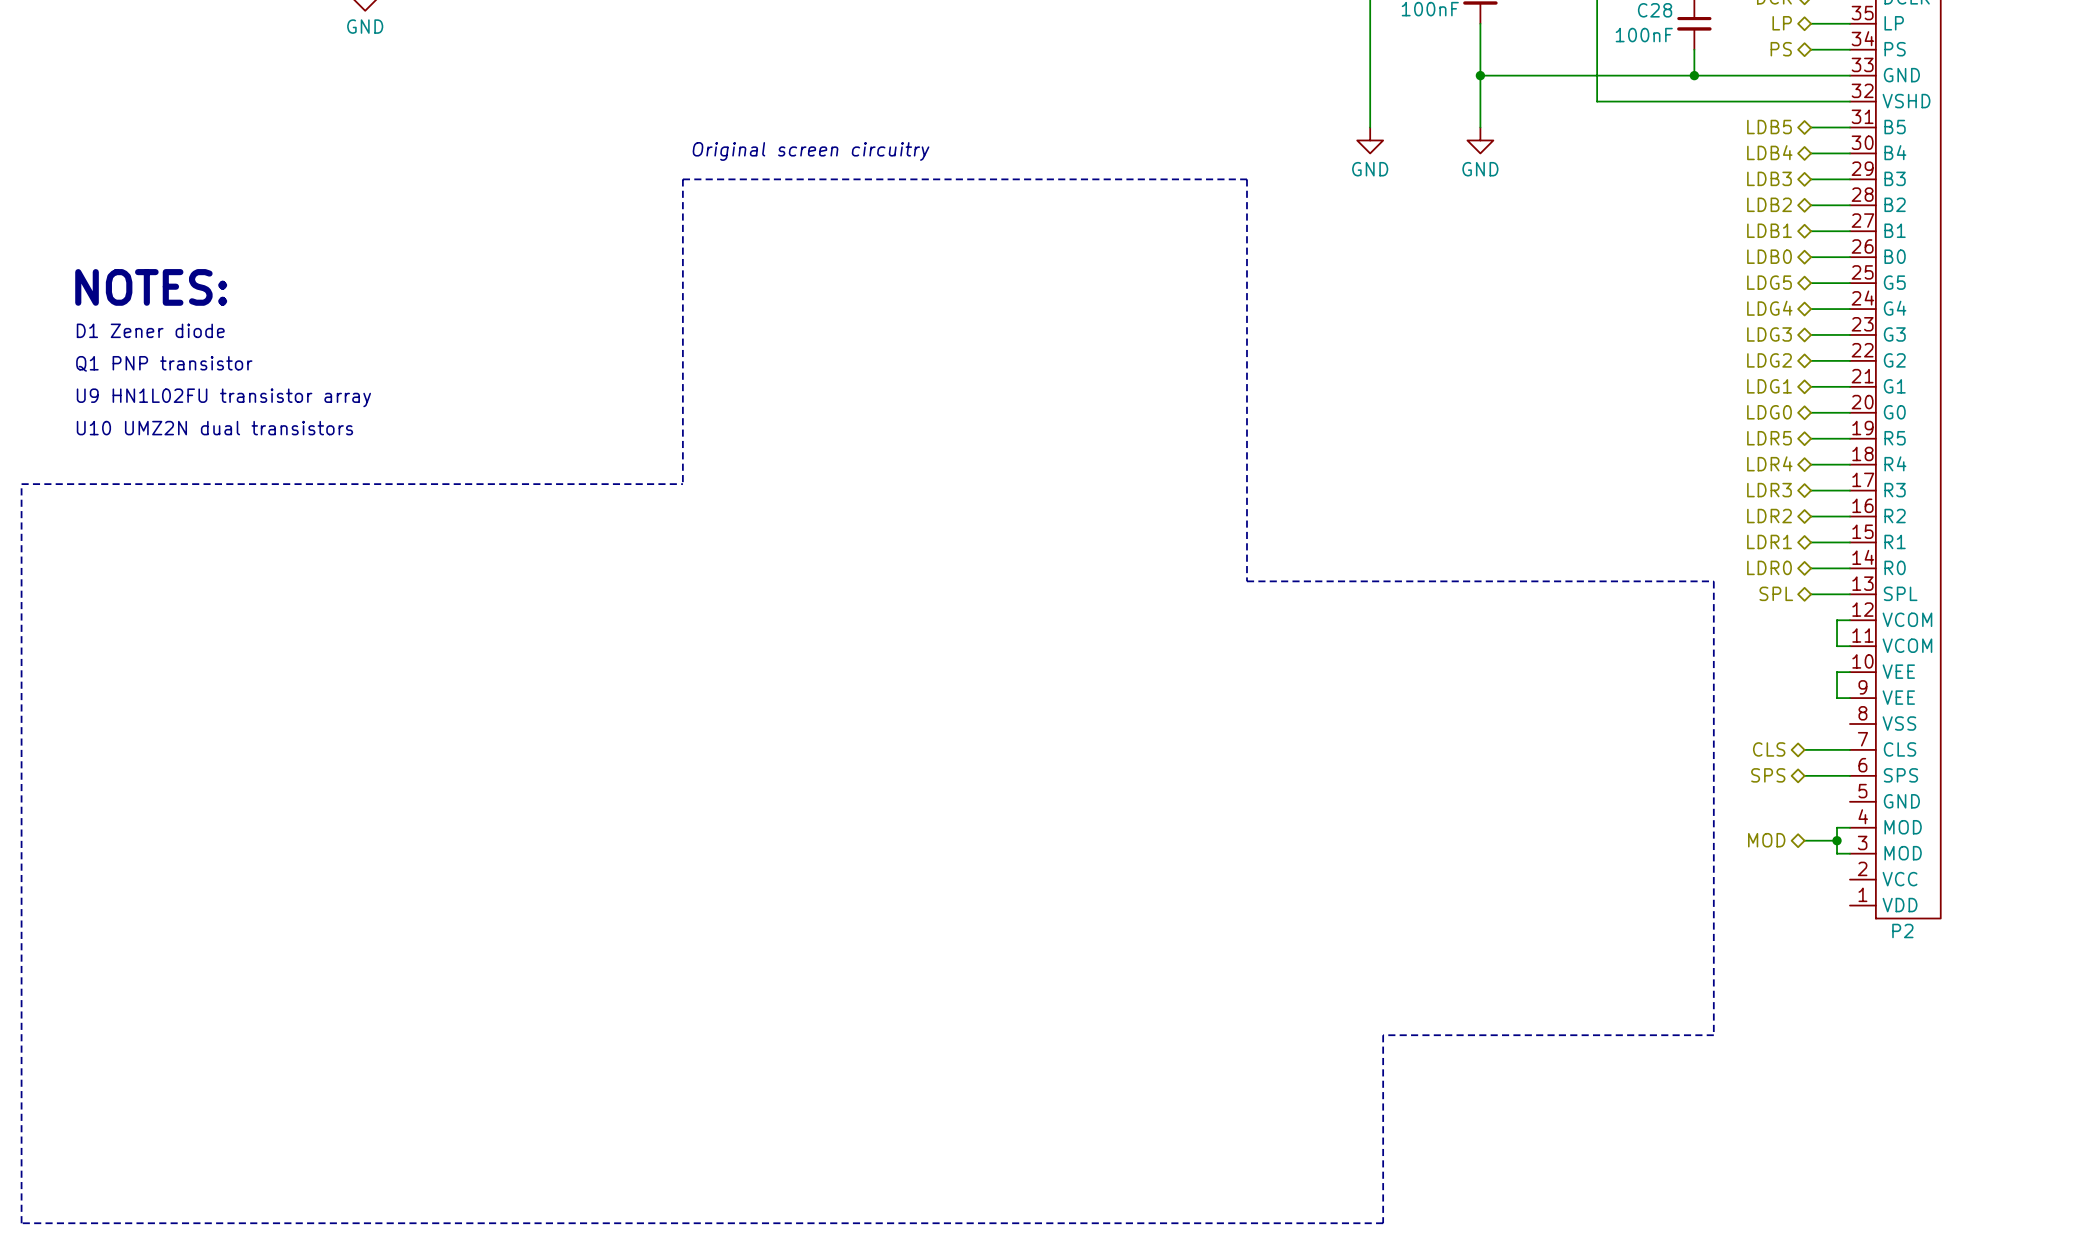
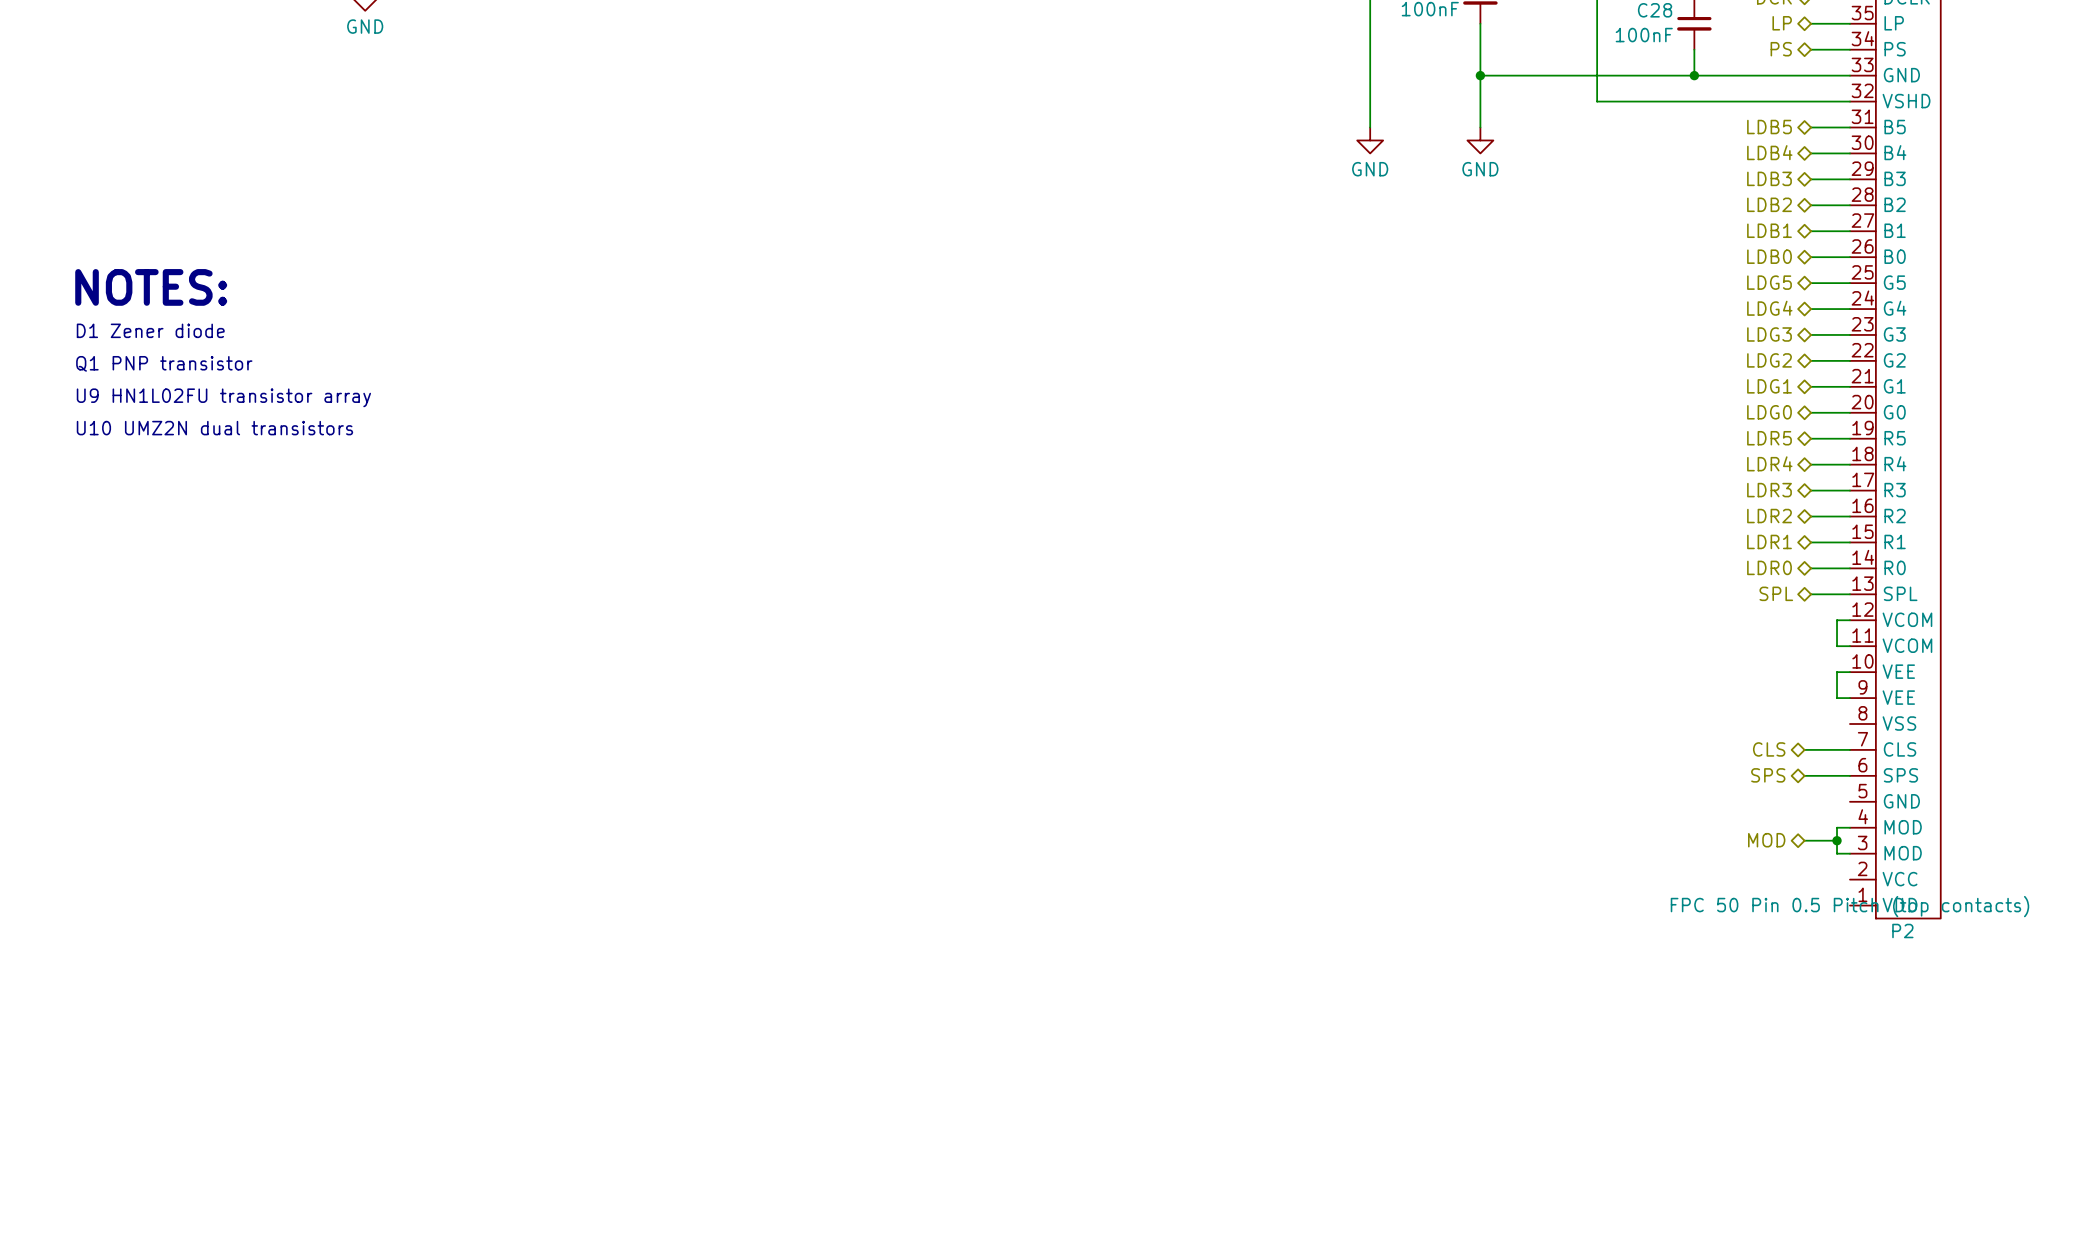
text: Original screen circuitry (811, 151) -> none
line: (682, 179) (1246, 179) (1246, 581) (1713, 581) (1713, 1035) (1383, 1035) (1383, 1223) (21, 1223) (21, 484) (682, 484) (682, 179) -> none
P2 value: none -> FPC 50 Pin 0.5 Pitch (top contacts) (1849, 906)

